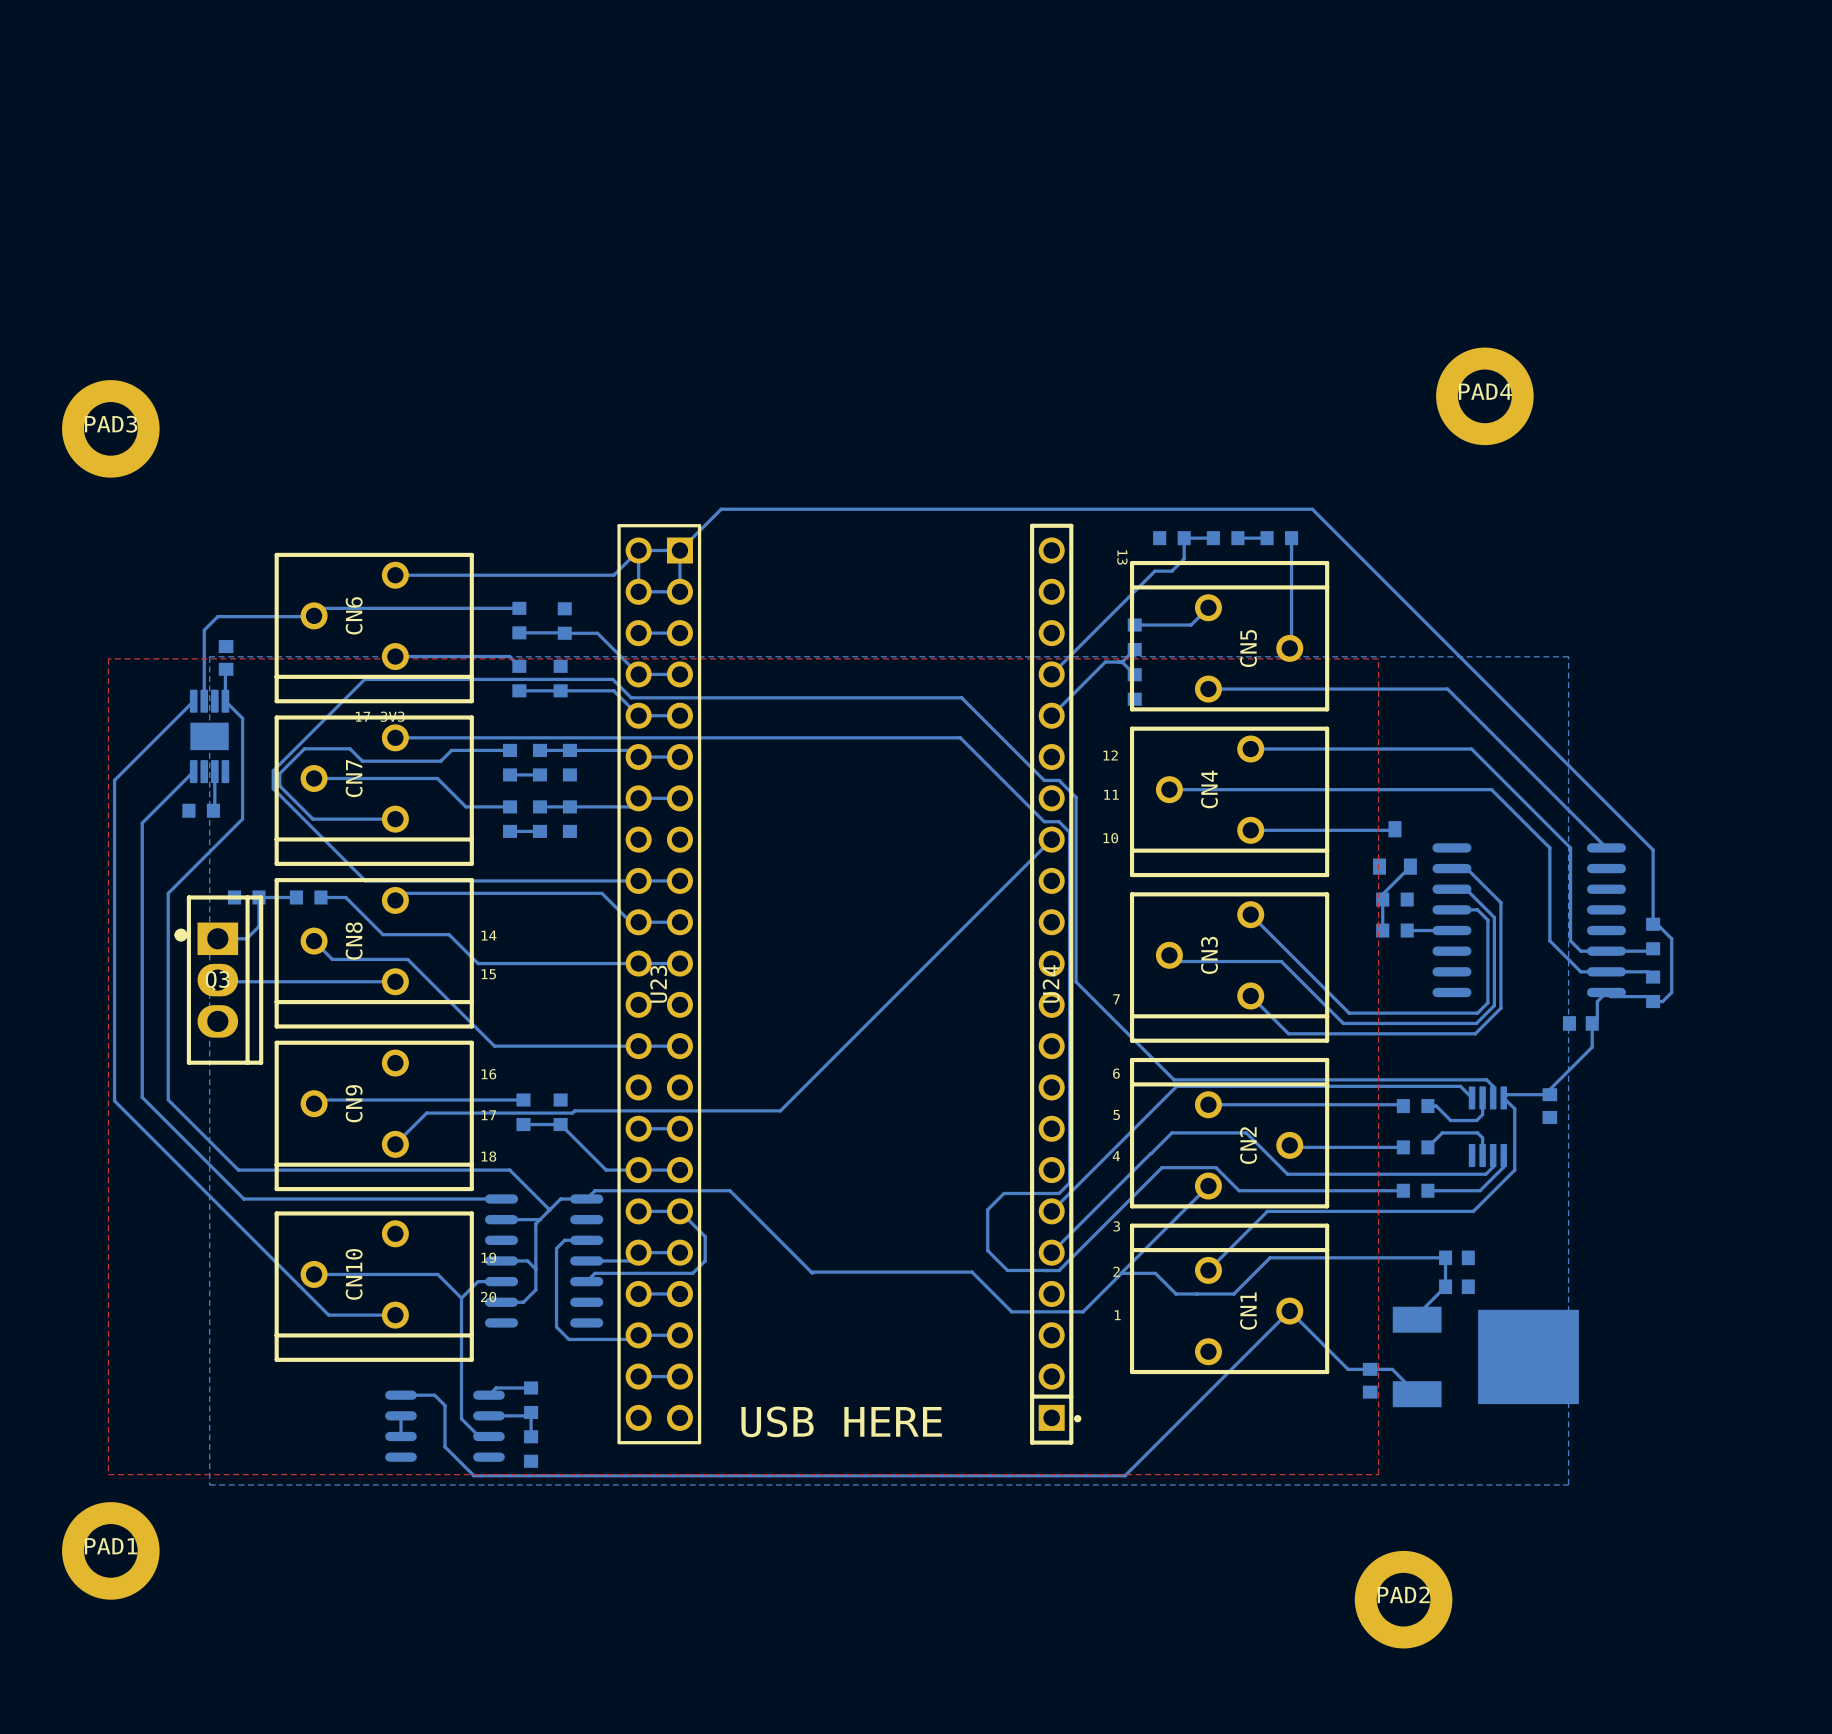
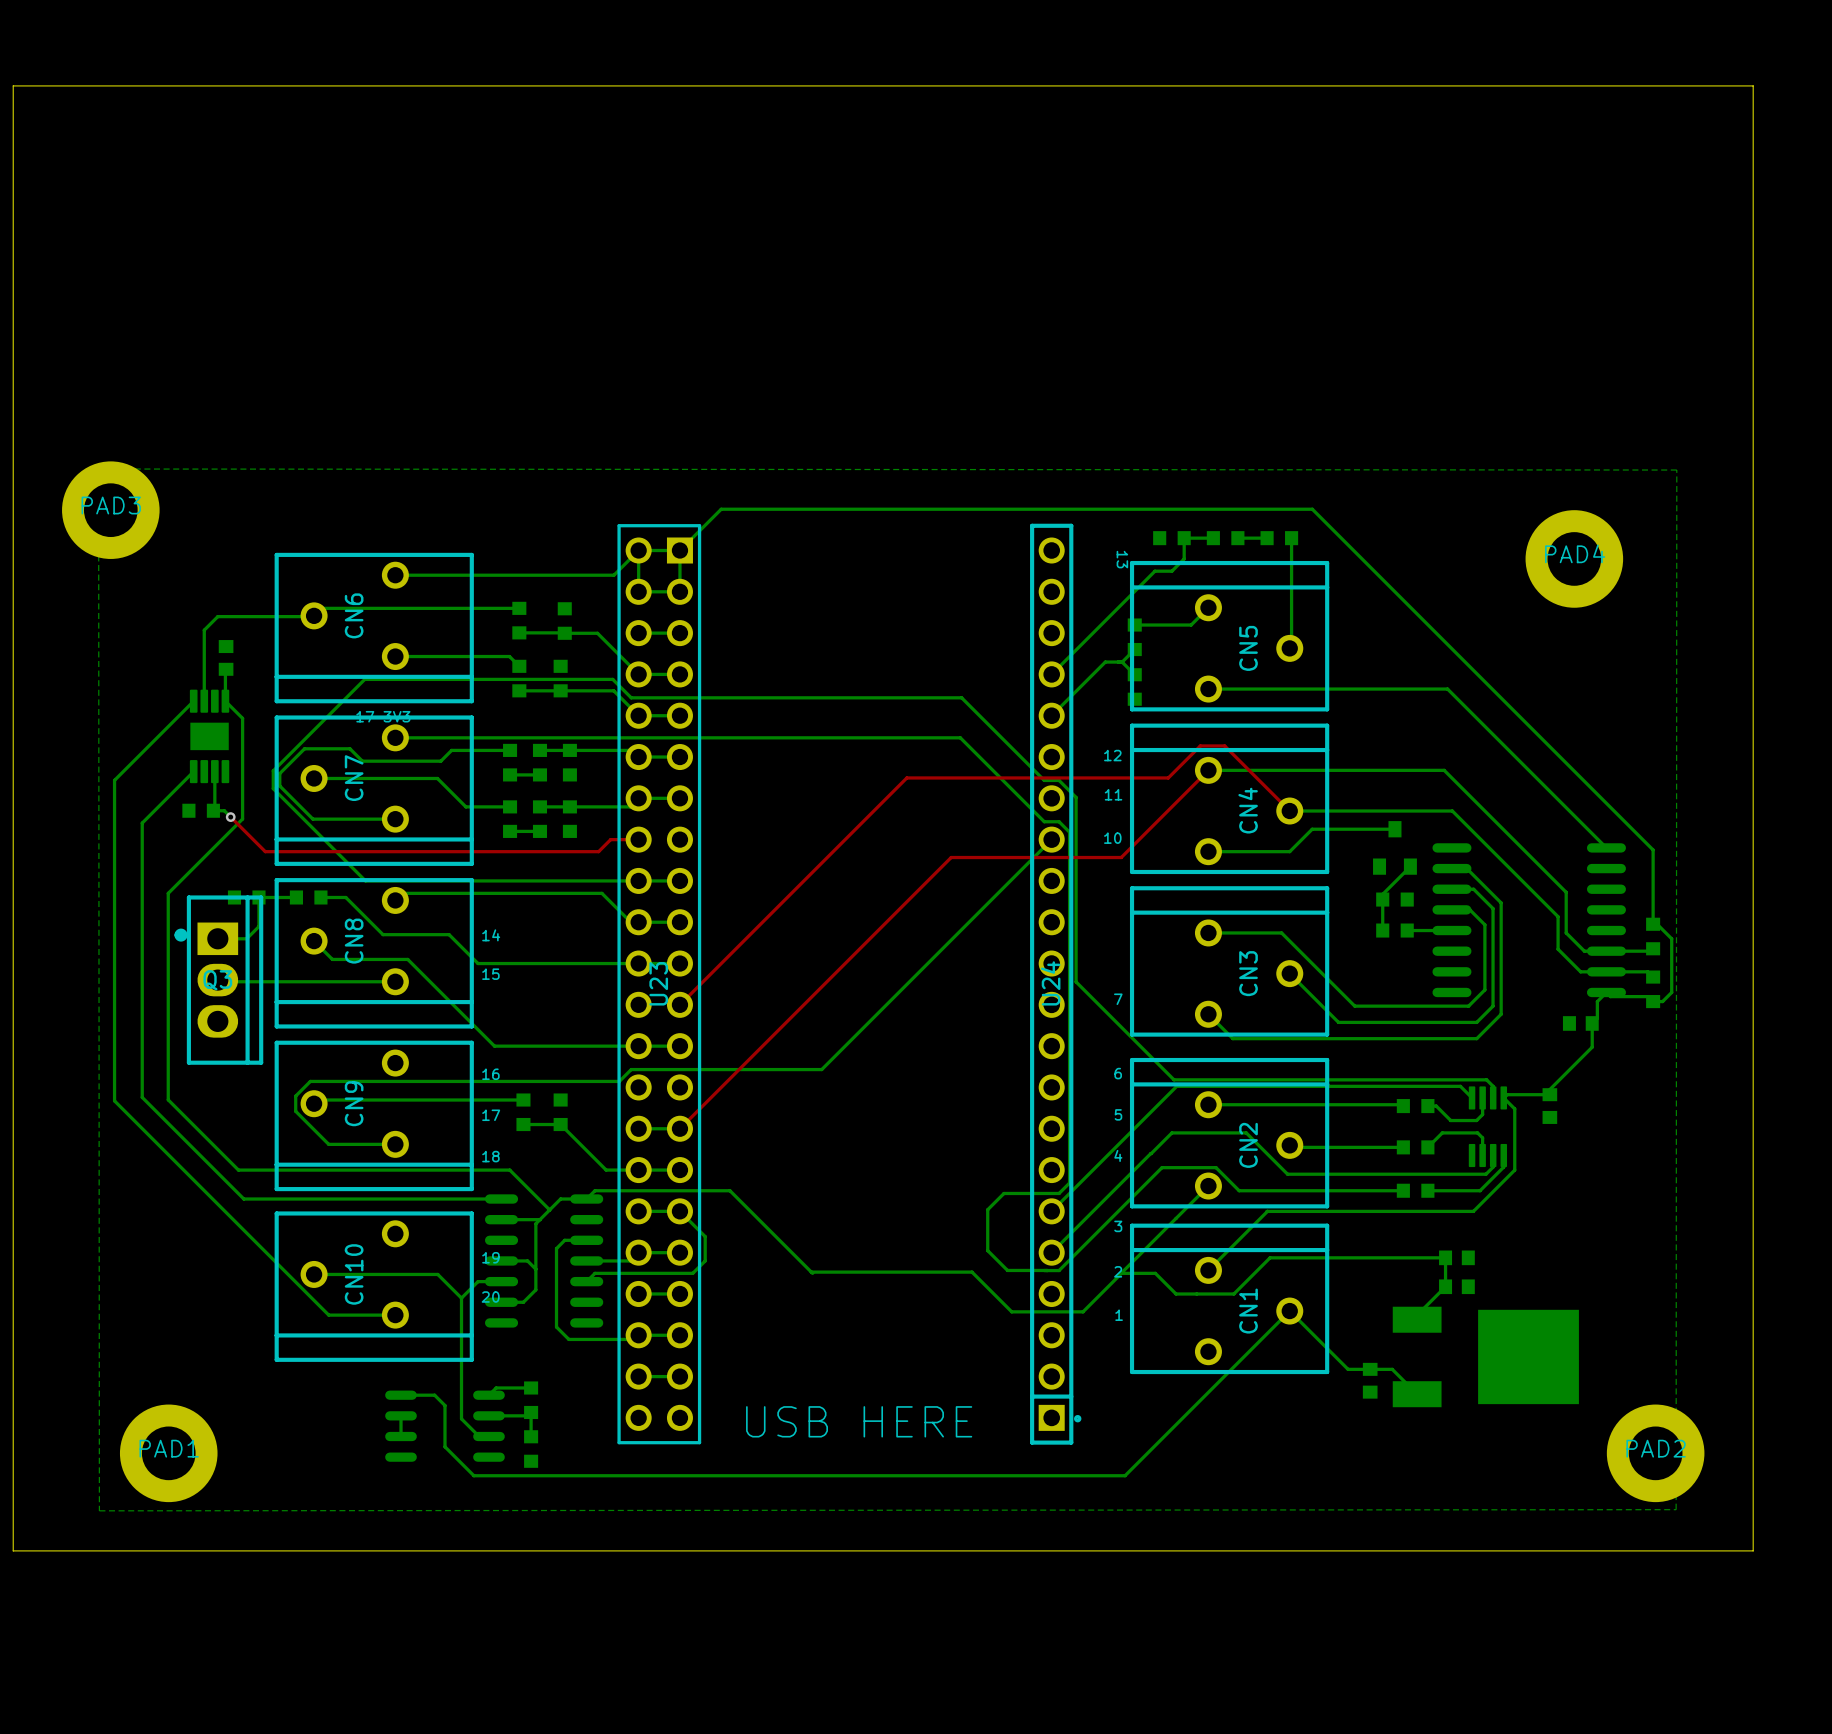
board edge: none -> (13, 85) (1753, 85) (1753, 1550) (13, 1550) (13, 85)
PAD4 position: (1484, 396) -> (1574, 558)
PAD3 position: (110, 428) -> (110, 510)
bottom zone outline: (209, 656) (1568, 656) (1568, 1484) (209, 1484) (209, 656) -> (98, 469) (99, 1510) (1676, 1509) (1676, 470) (98, 469)
top zone outline: (108, 658) (1378, 658) (1378, 1474) (108, 1474) (108, 658) -> none
CN4 footprint: [1129, 726, 1330, 878] -> [1129, 723, 1330, 875]
bottom track: (1250, 749) (1471, 749) (1570, 847) (1570, 940) (1580, 951) (1584, 951) -> (1208, 770) (1444, 770) (1566, 892) (1566, 932) (1584, 951)
top track: none -> (1208, 770) (1121, 857) (951, 857) (679, 1128)
bottom track: (1169, 789) (1491, 789) (1549, 847) (1549, 940) (1580, 971) -> (1289, 811) (1452, 811) (1558, 916) (1558, 949) (1580, 971)
CN4 name position: CN4 (1209, 789) -> CN4 (1248, 810)
bottom track: none -> (213, 810) (224, 810) (230, 817)
top track: none -> (1289, 811) (1224, 745) (1200, 745) (1168, 777) (906, 777) (679, 1004)
top track: none -> (230, 817) (265, 851) (598, 851) (610, 839) (638, 839)
via: none -> (230, 817)
bottom track: (1394, 829) (1250, 830) -> (1394, 829) (1312, 829) (1289, 851) (1208, 851)
bottom track: (1466, 889) (1494, 917) (1494, 1005) (1476, 1023) (1343, 1023) (1281, 961) (1175, 961) (1169, 955) -> (1466, 889) (1473, 889) (1493, 908) (1493, 1006) (1476, 1022) (1338, 1022) (1289, 973)
bottom track: (1500, 902) (1500, 1008) (1475, 1033) (1288, 1033) (1250, 995) -> (1500, 902) (1501, 1014) (1476, 1038) (1232, 1038) (1208, 1014)
bottom track: (1469, 909) (1477, 909) (1487, 920) (1487, 1002) (1477, 1013) (1349, 1013) (1250, 914) -> (1469, 909) (1484, 924) (1484, 989) (1468, 1006) (1354, 1006) (1281, 932) (1208, 932)
CN3 rotation: 0° (1229, 967) -> 180° (1229, 961)
bottom track: (821, 1069) (780, 1110) (426, 1113) (395, 1144) -> (821, 1069) (631, 1069) (619, 1081) (310, 1081) (295, 1096) (295, 1111) (328, 1144) (395, 1144)
PAD1 position: (110, 1550) -> (168, 1453)
PAD2 position: (1403, 1599) -> (1655, 1453)

